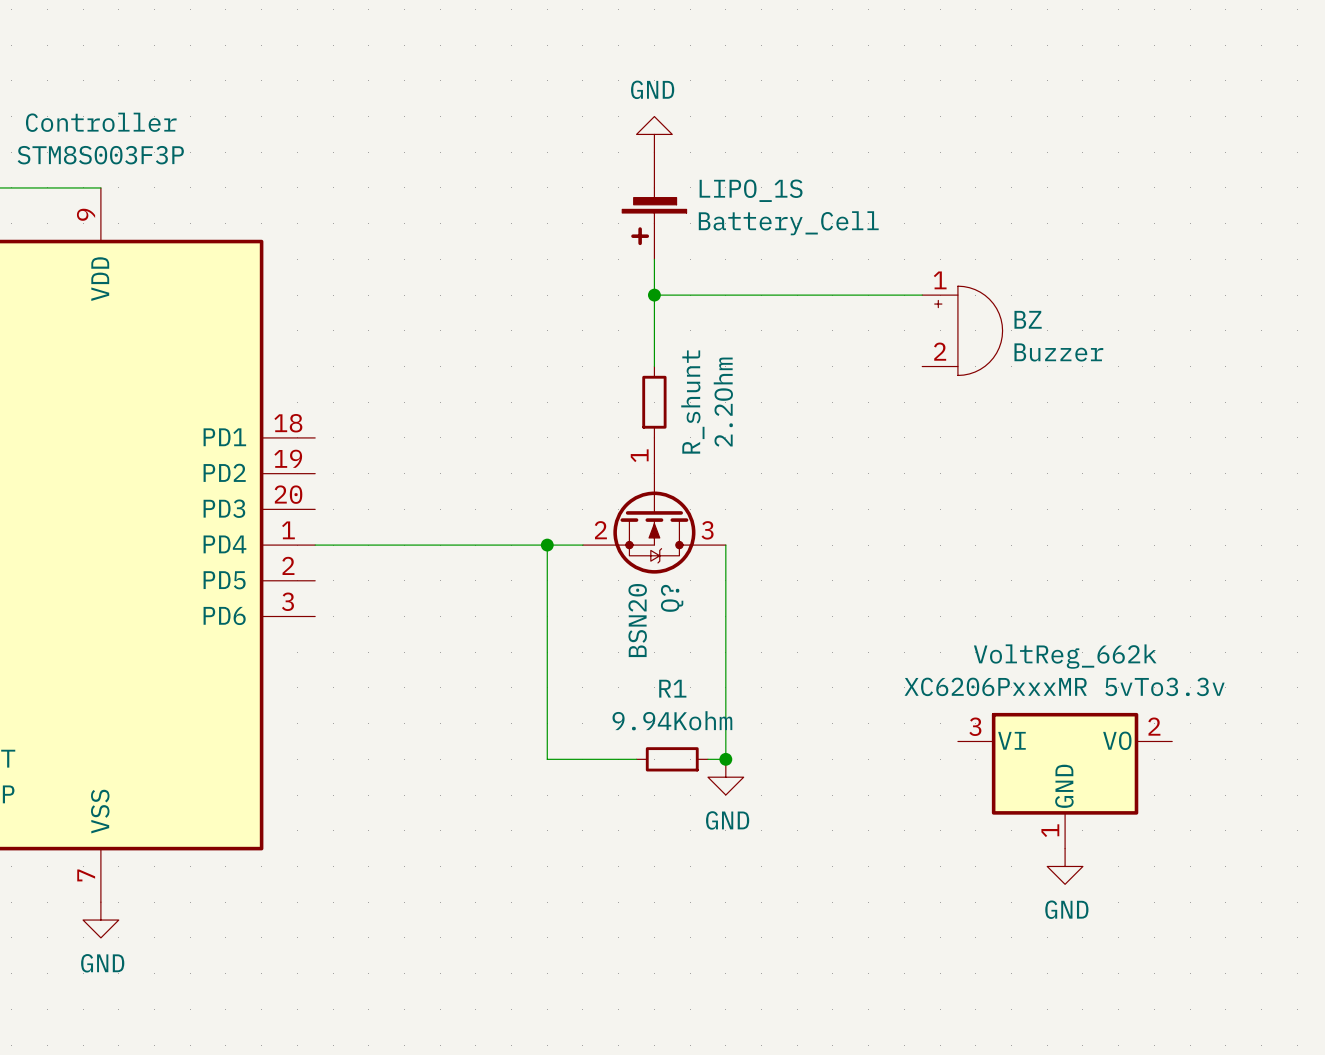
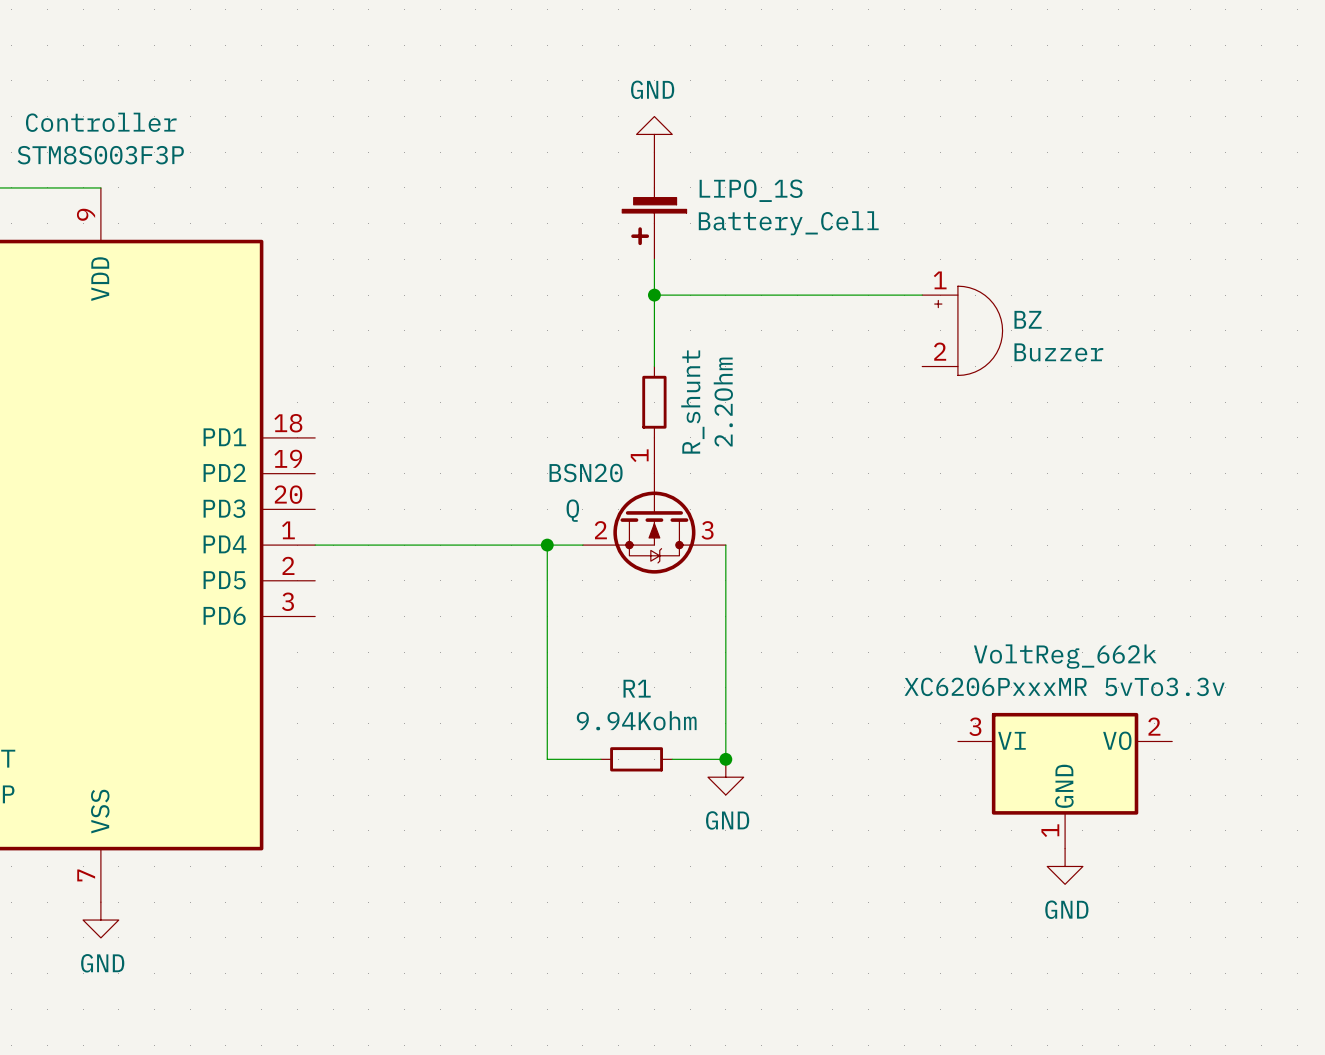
Q? name: Q? (672, 598) -> Q (572, 510)
Q? value rotation: 0° (637, 620) -> 90° clockwise (586, 472)
Q? value position: BSN20 (637, 620) -> BSN20 (586, 472)
wire: (600, 759) (636, 759) -> (672, 759) (707, 759)
R1 position: (672, 759) -> (636, 759)

